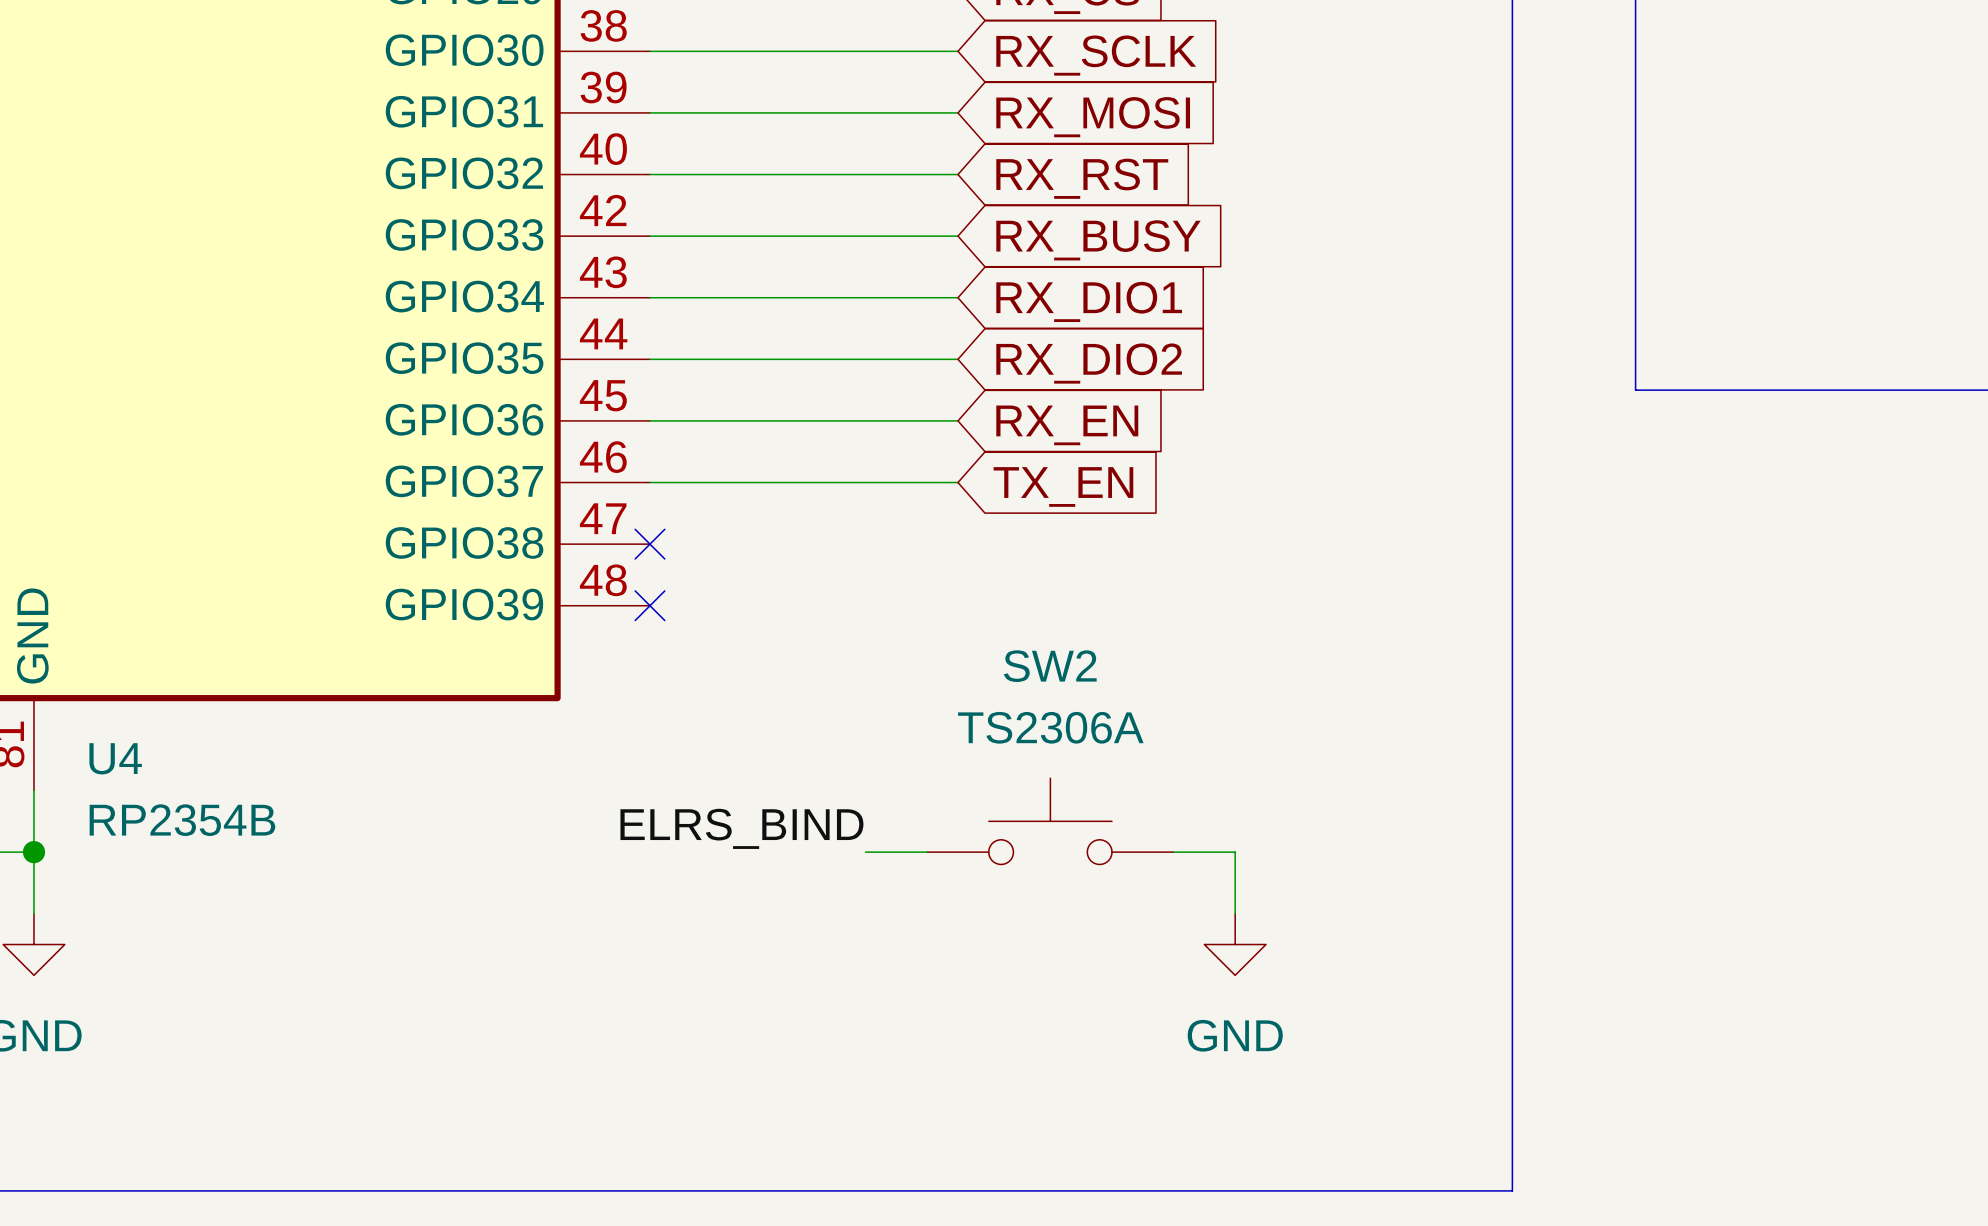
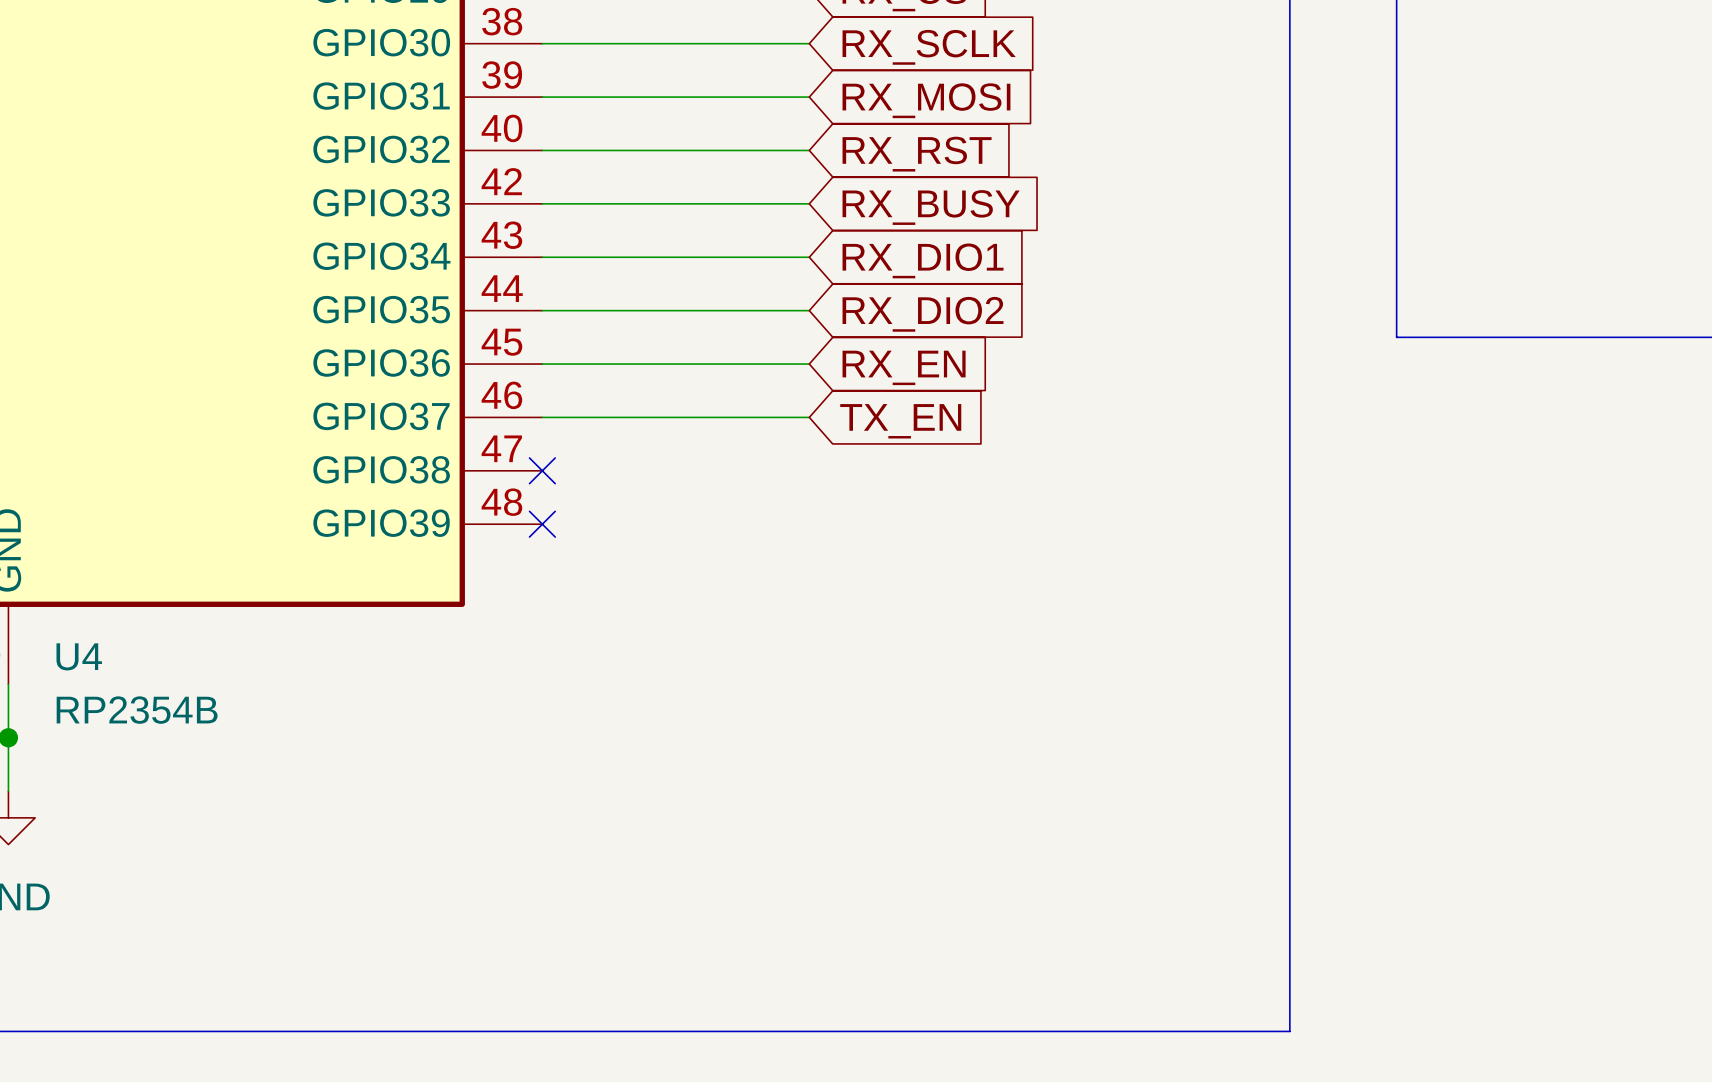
SW2: TS2306A (1050, 821) -> none
label: ELRS_BIND (741, 828) -> none
wire: (865, 852) (927, 852) -> none
wire: (1173, 852) (1235, 852) (1235, 913) -> none
power symbol: GND (1235, 944) -> none

